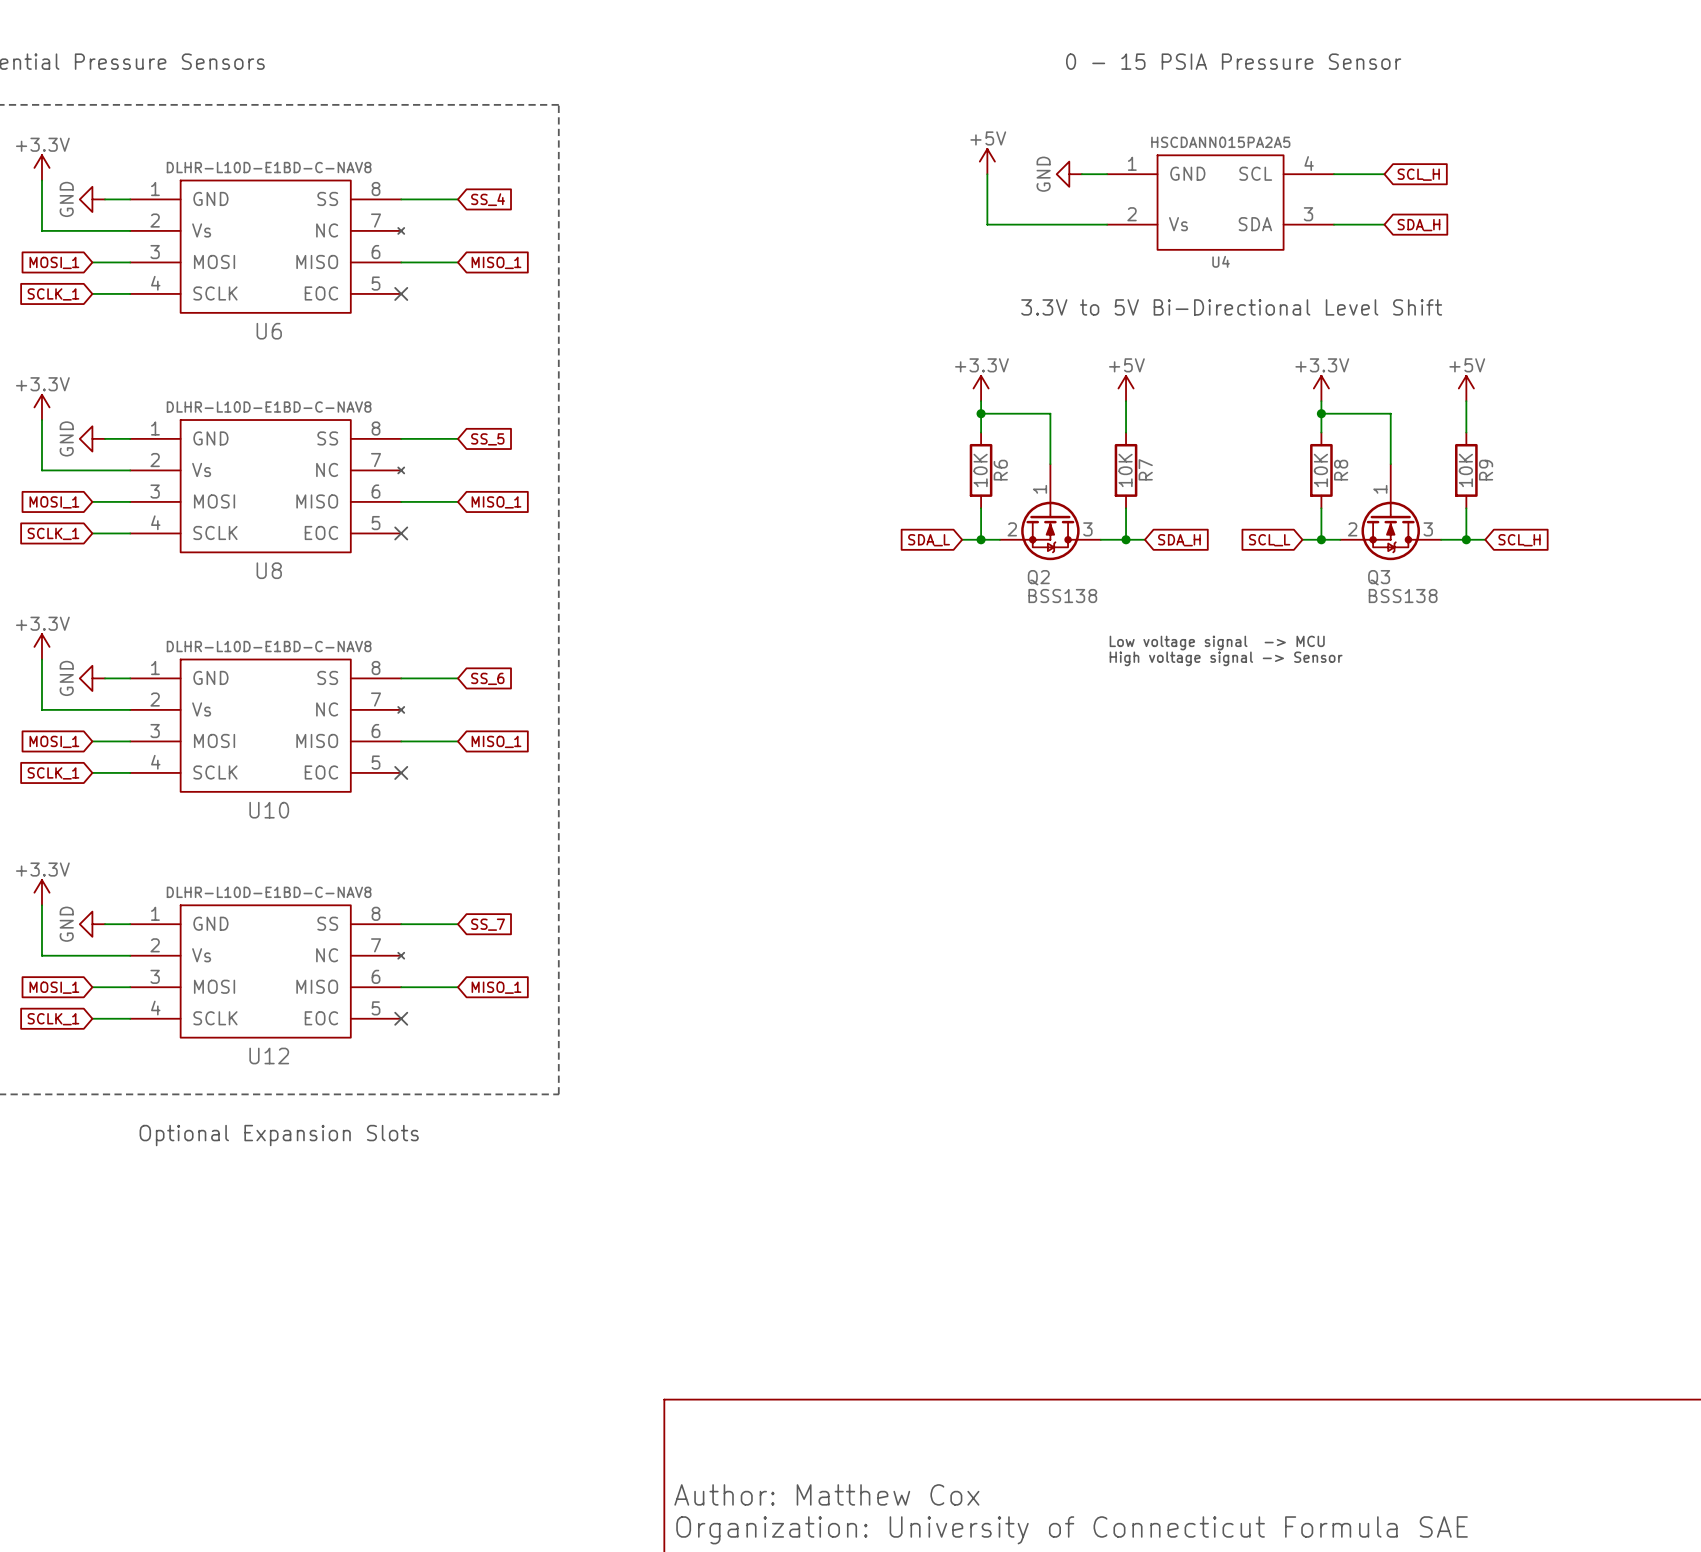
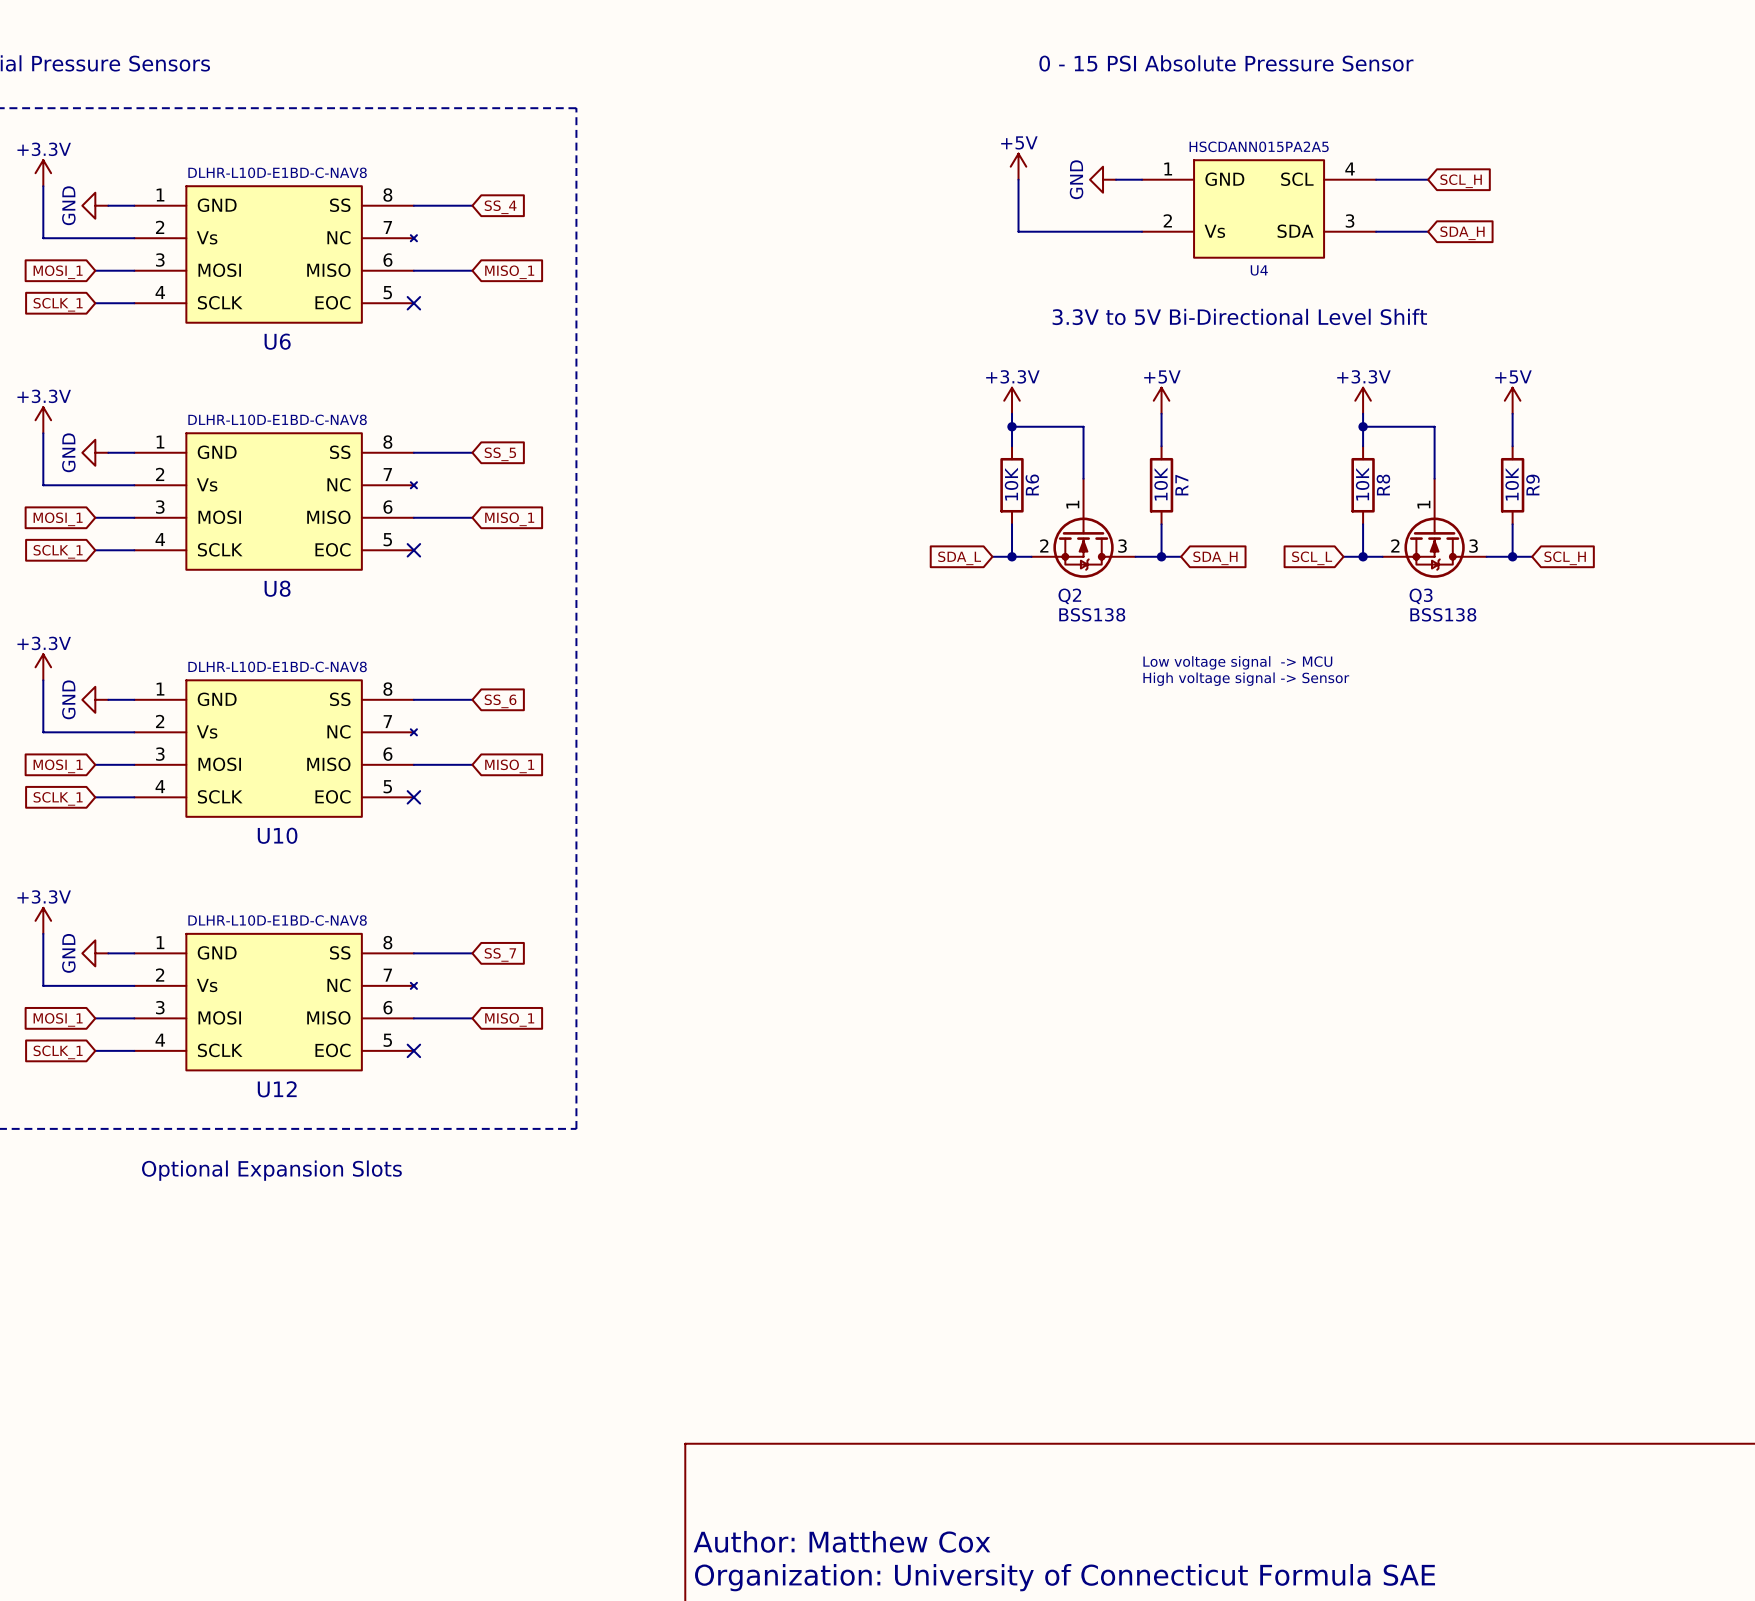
text: 0 - 15 PSIA Pressure Sensor (1233, 61) -> 0 - 15 PSI Absolute Pressure Sensor (1226, 63)

